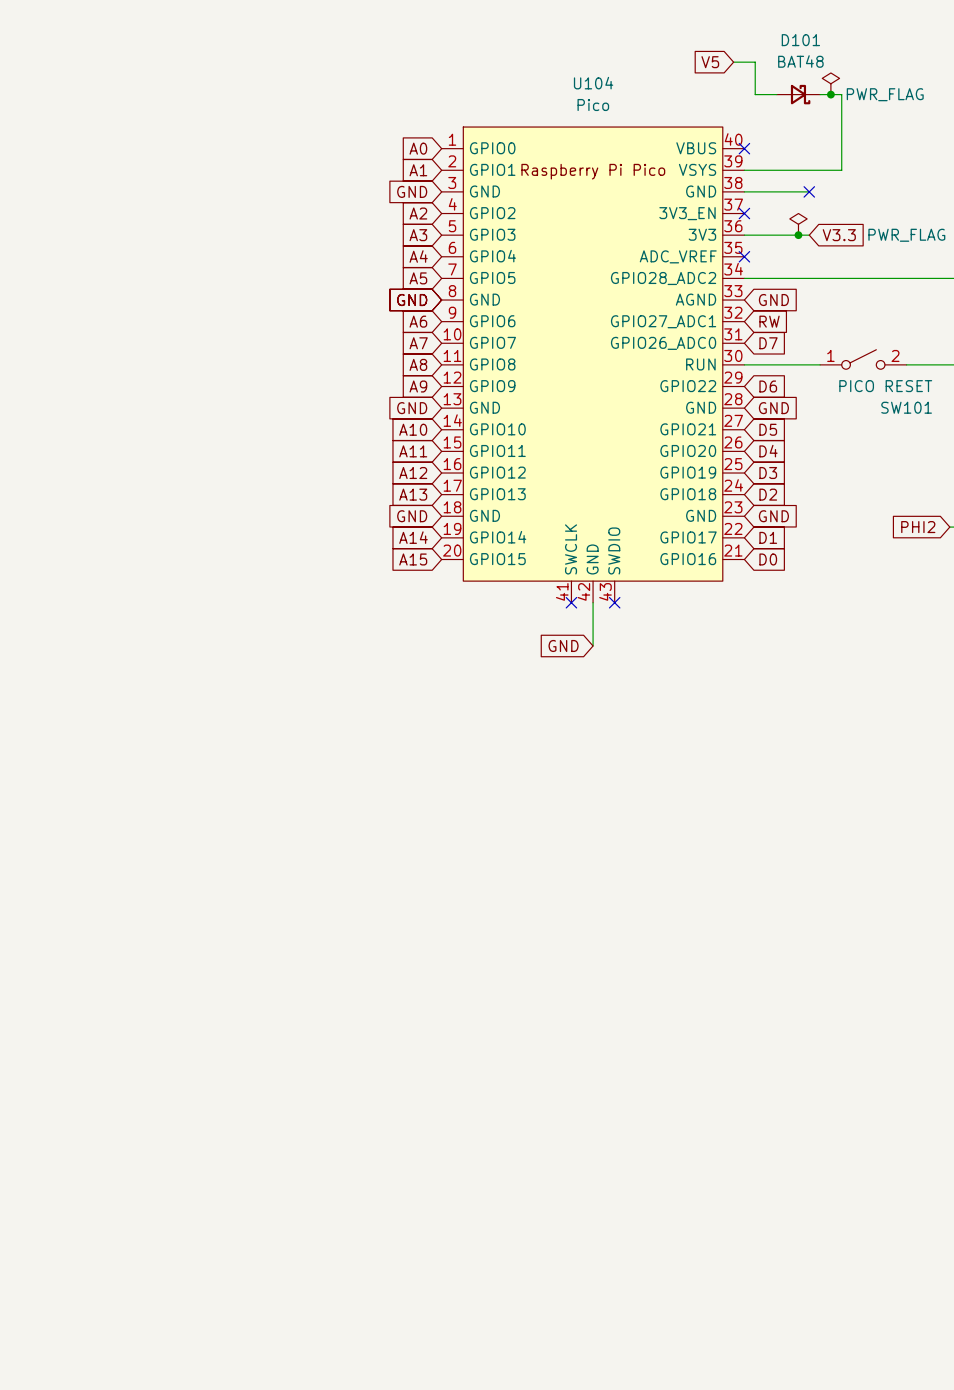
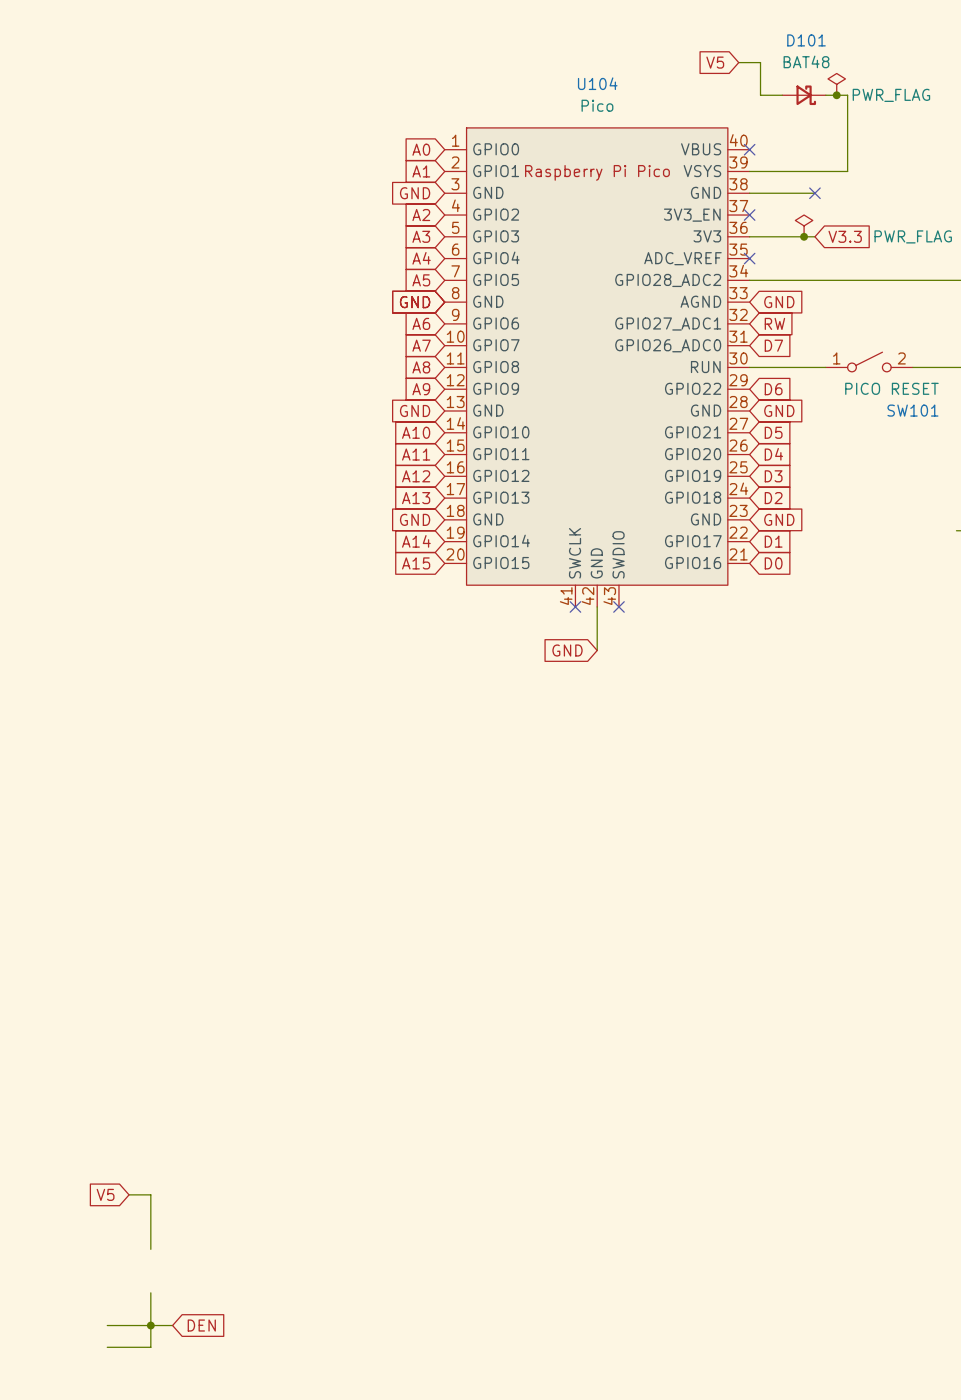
global label: PHI2 (918, 527) -> none
global label: none -> V5 (105, 1194)
wire: none -> (129, 1194) (150, 1194) (150, 1249)
wire: none -> (150, 1292) (150, 1347) (107, 1347)
wire: none -> (107, 1325) (172, 1325)
junction: none -> (150, 1325)
global label: none -> DEN (201, 1325)

